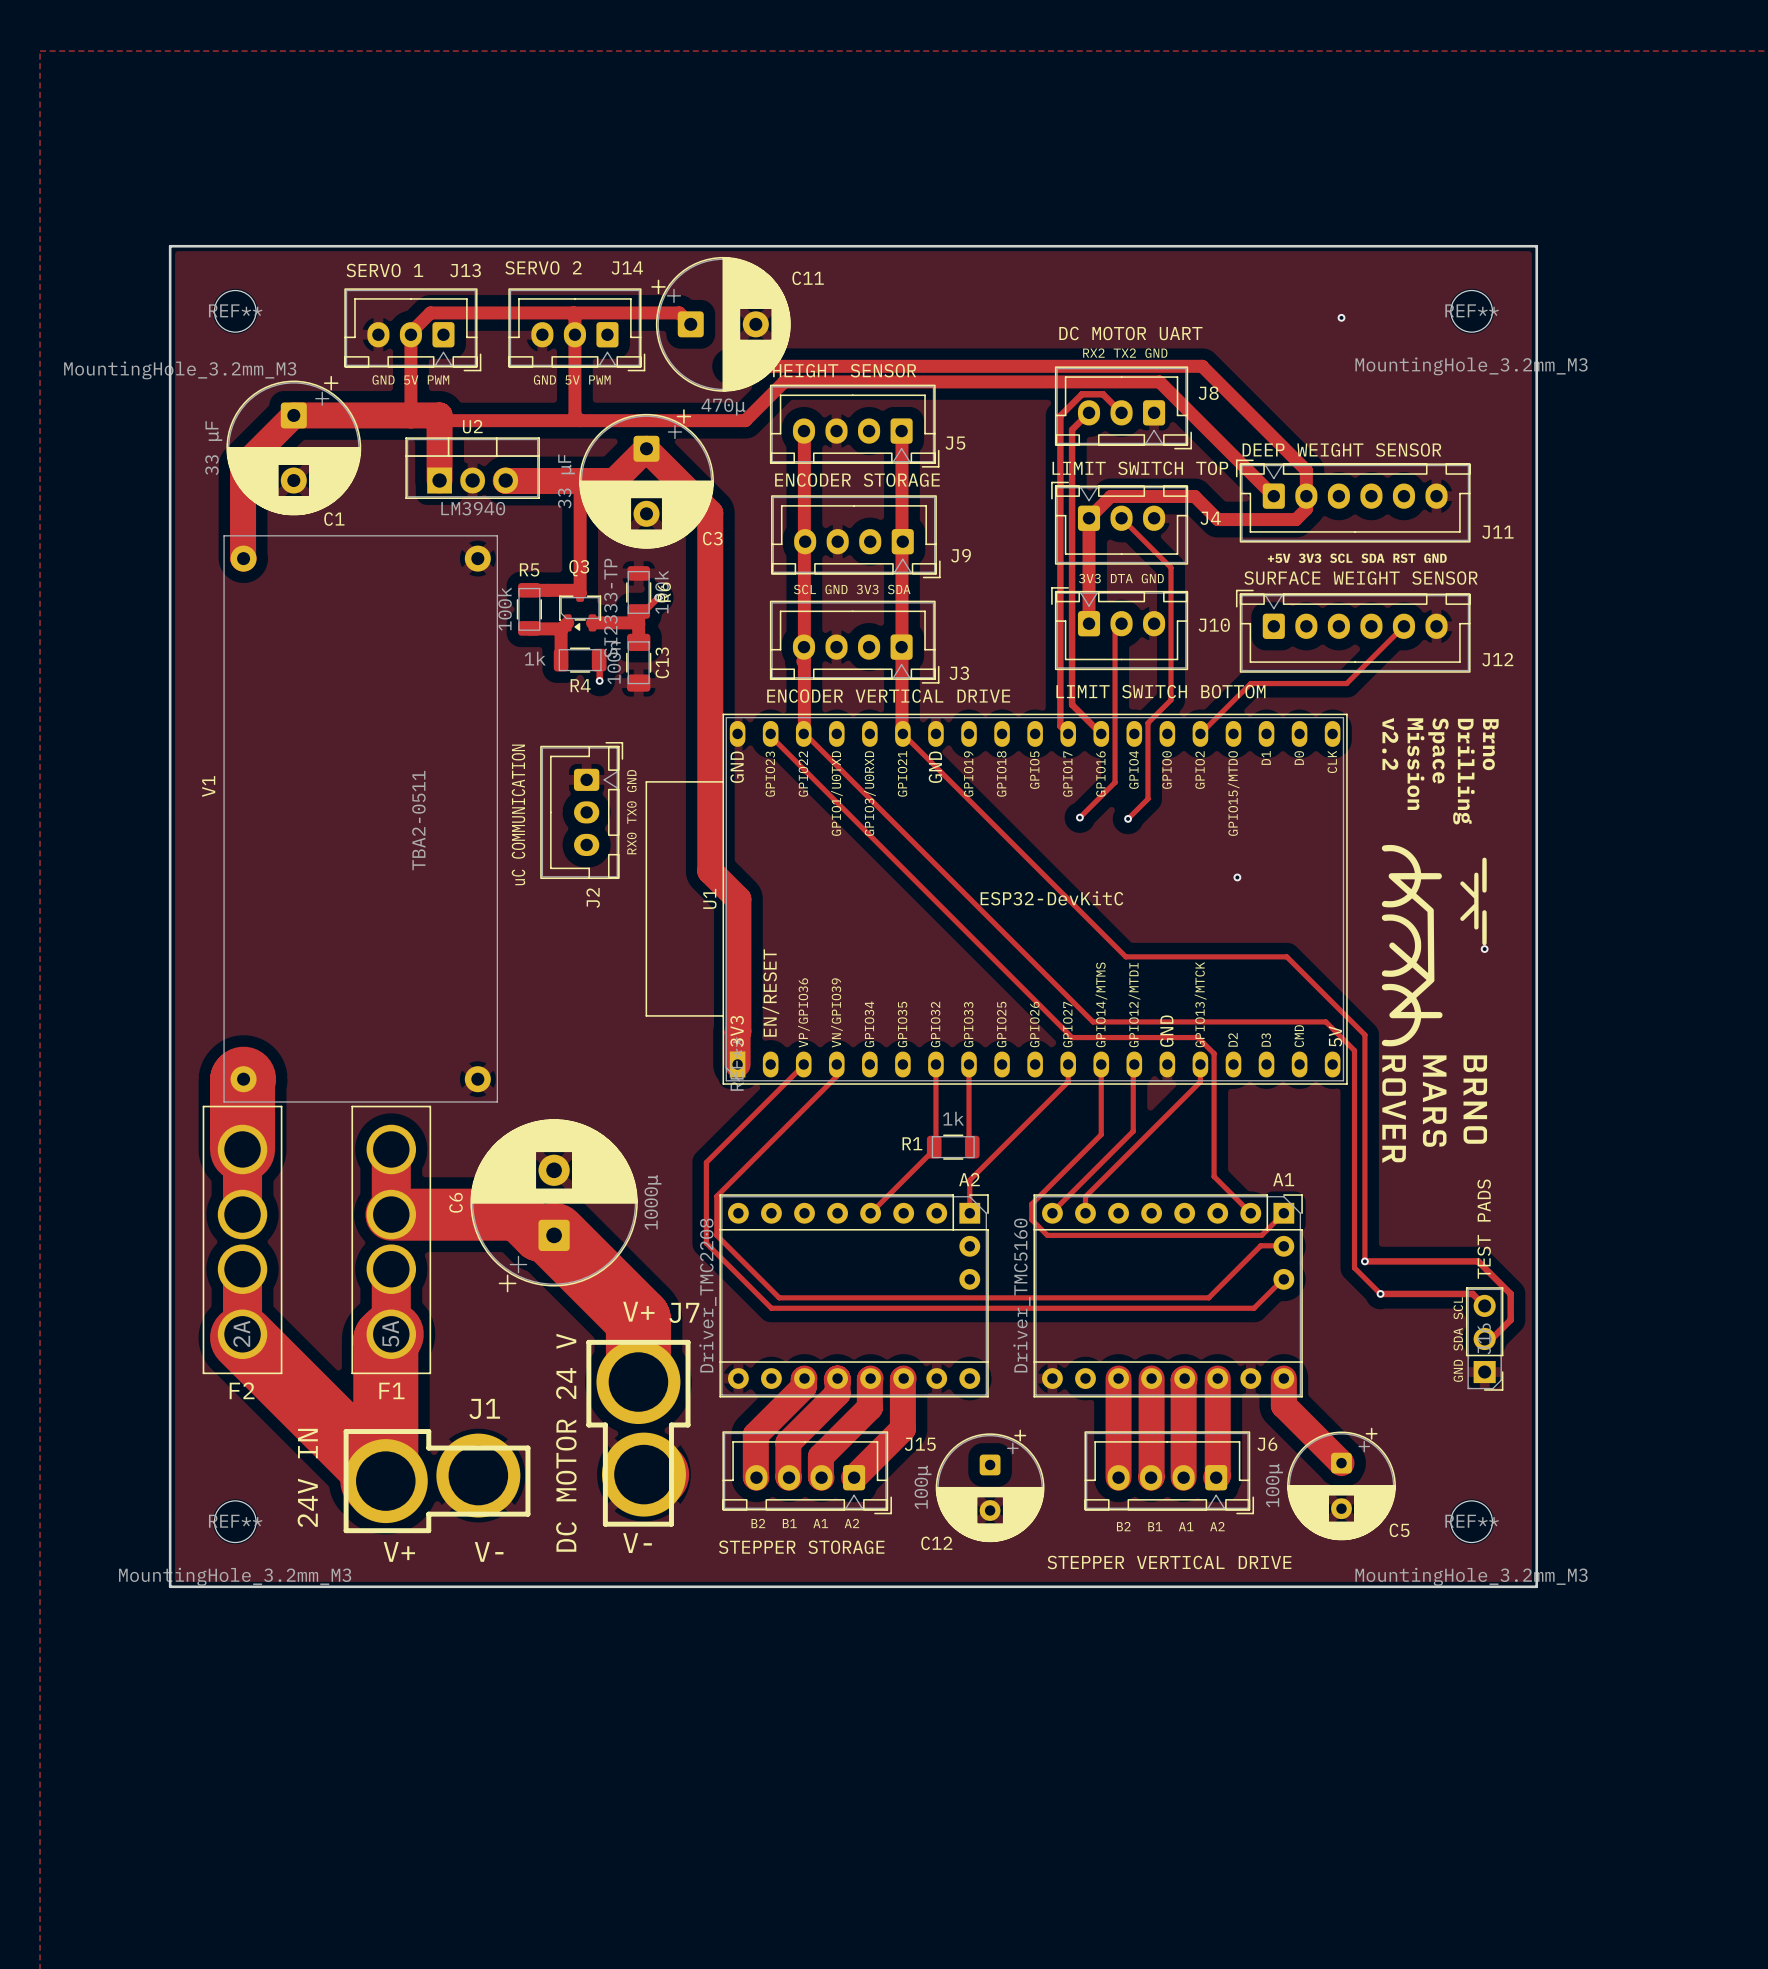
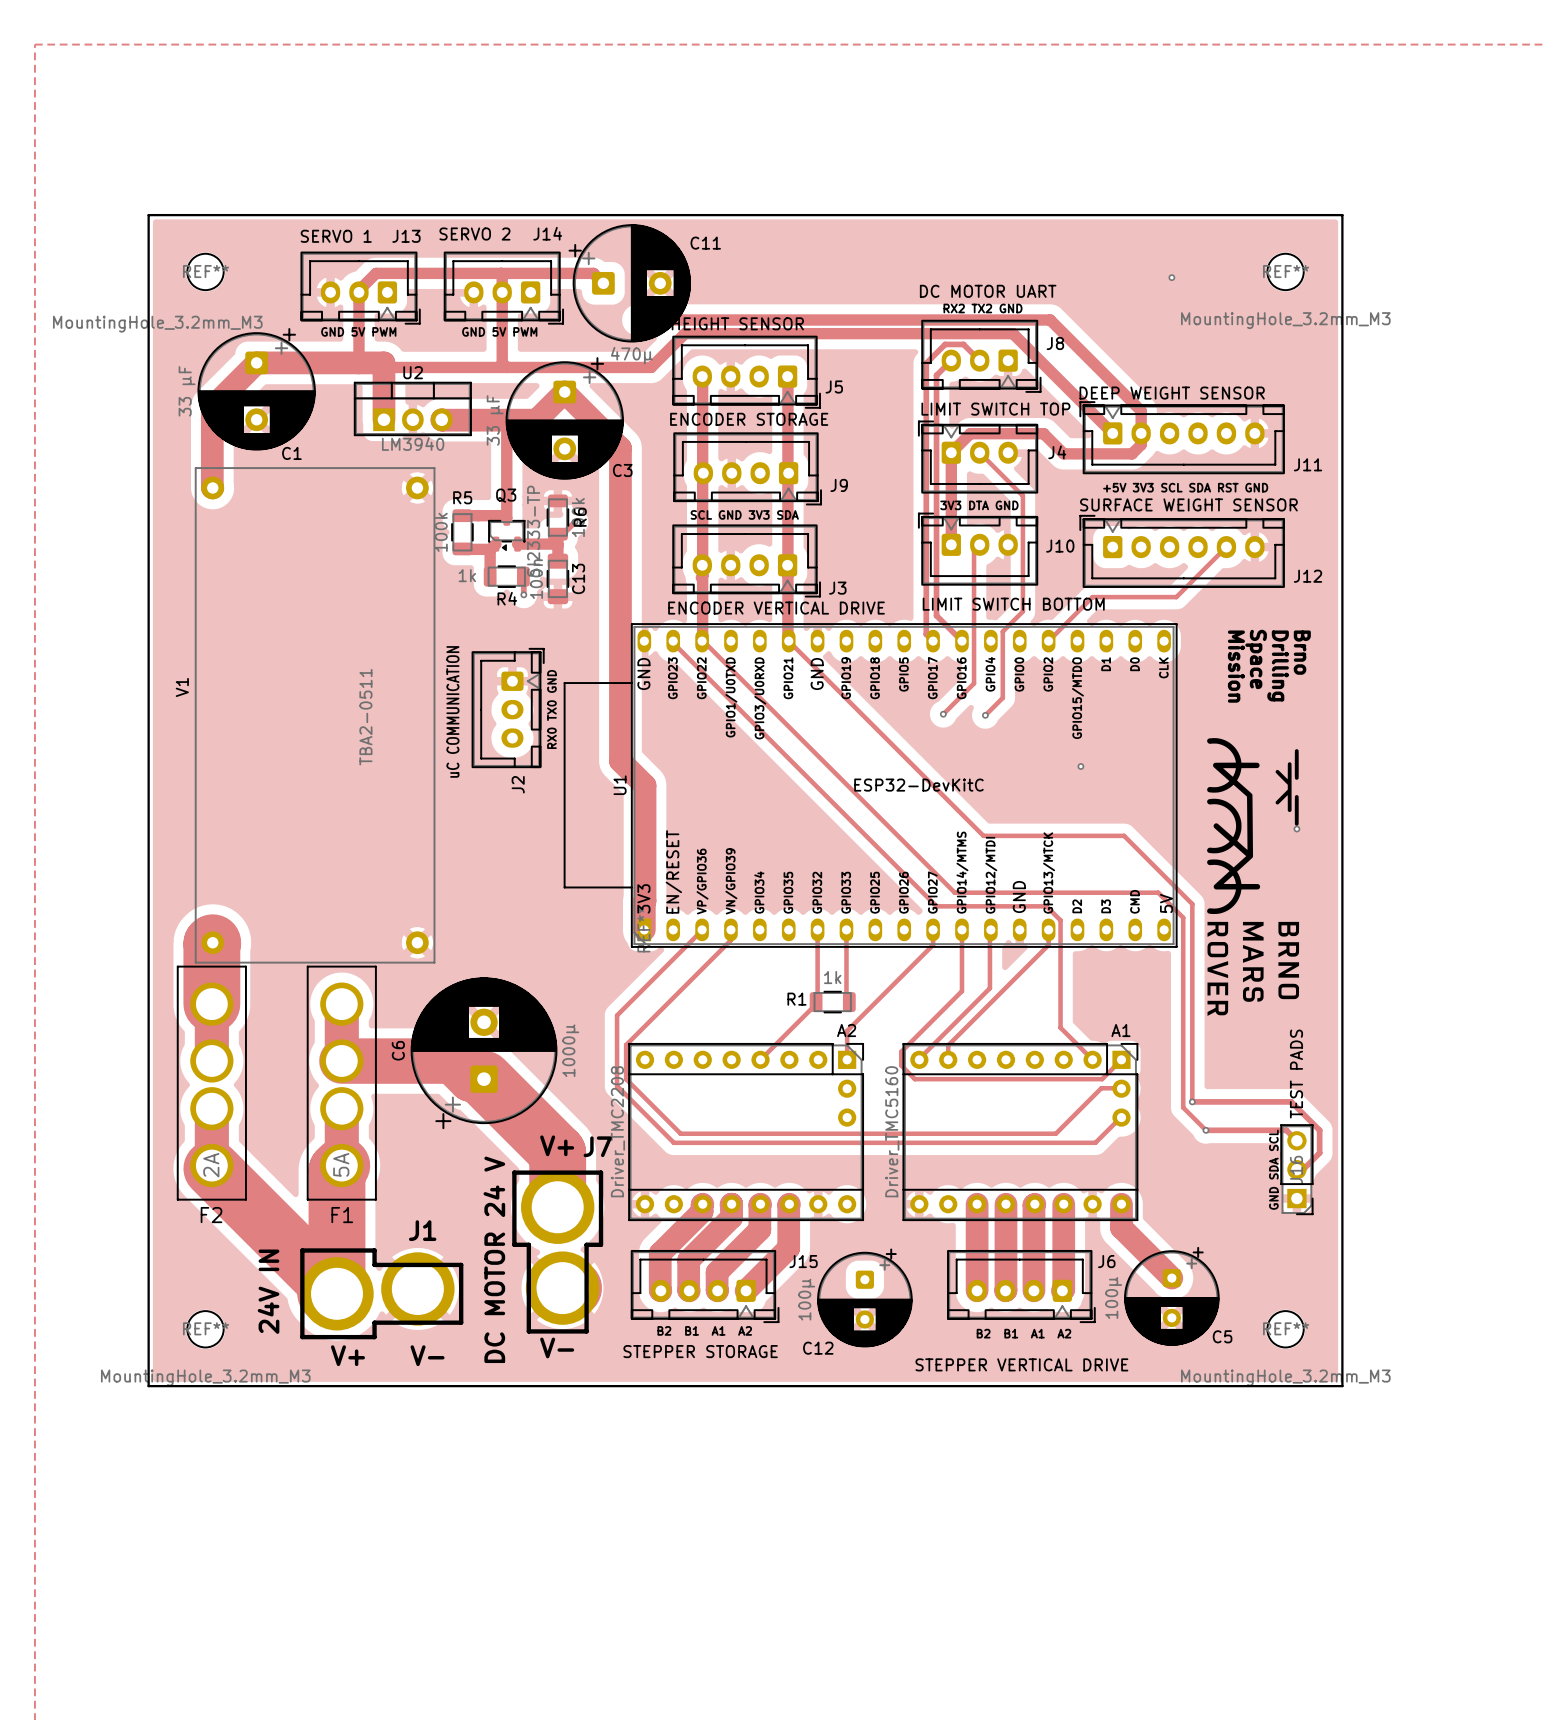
text: v2.2 (1390, 744) -> none

